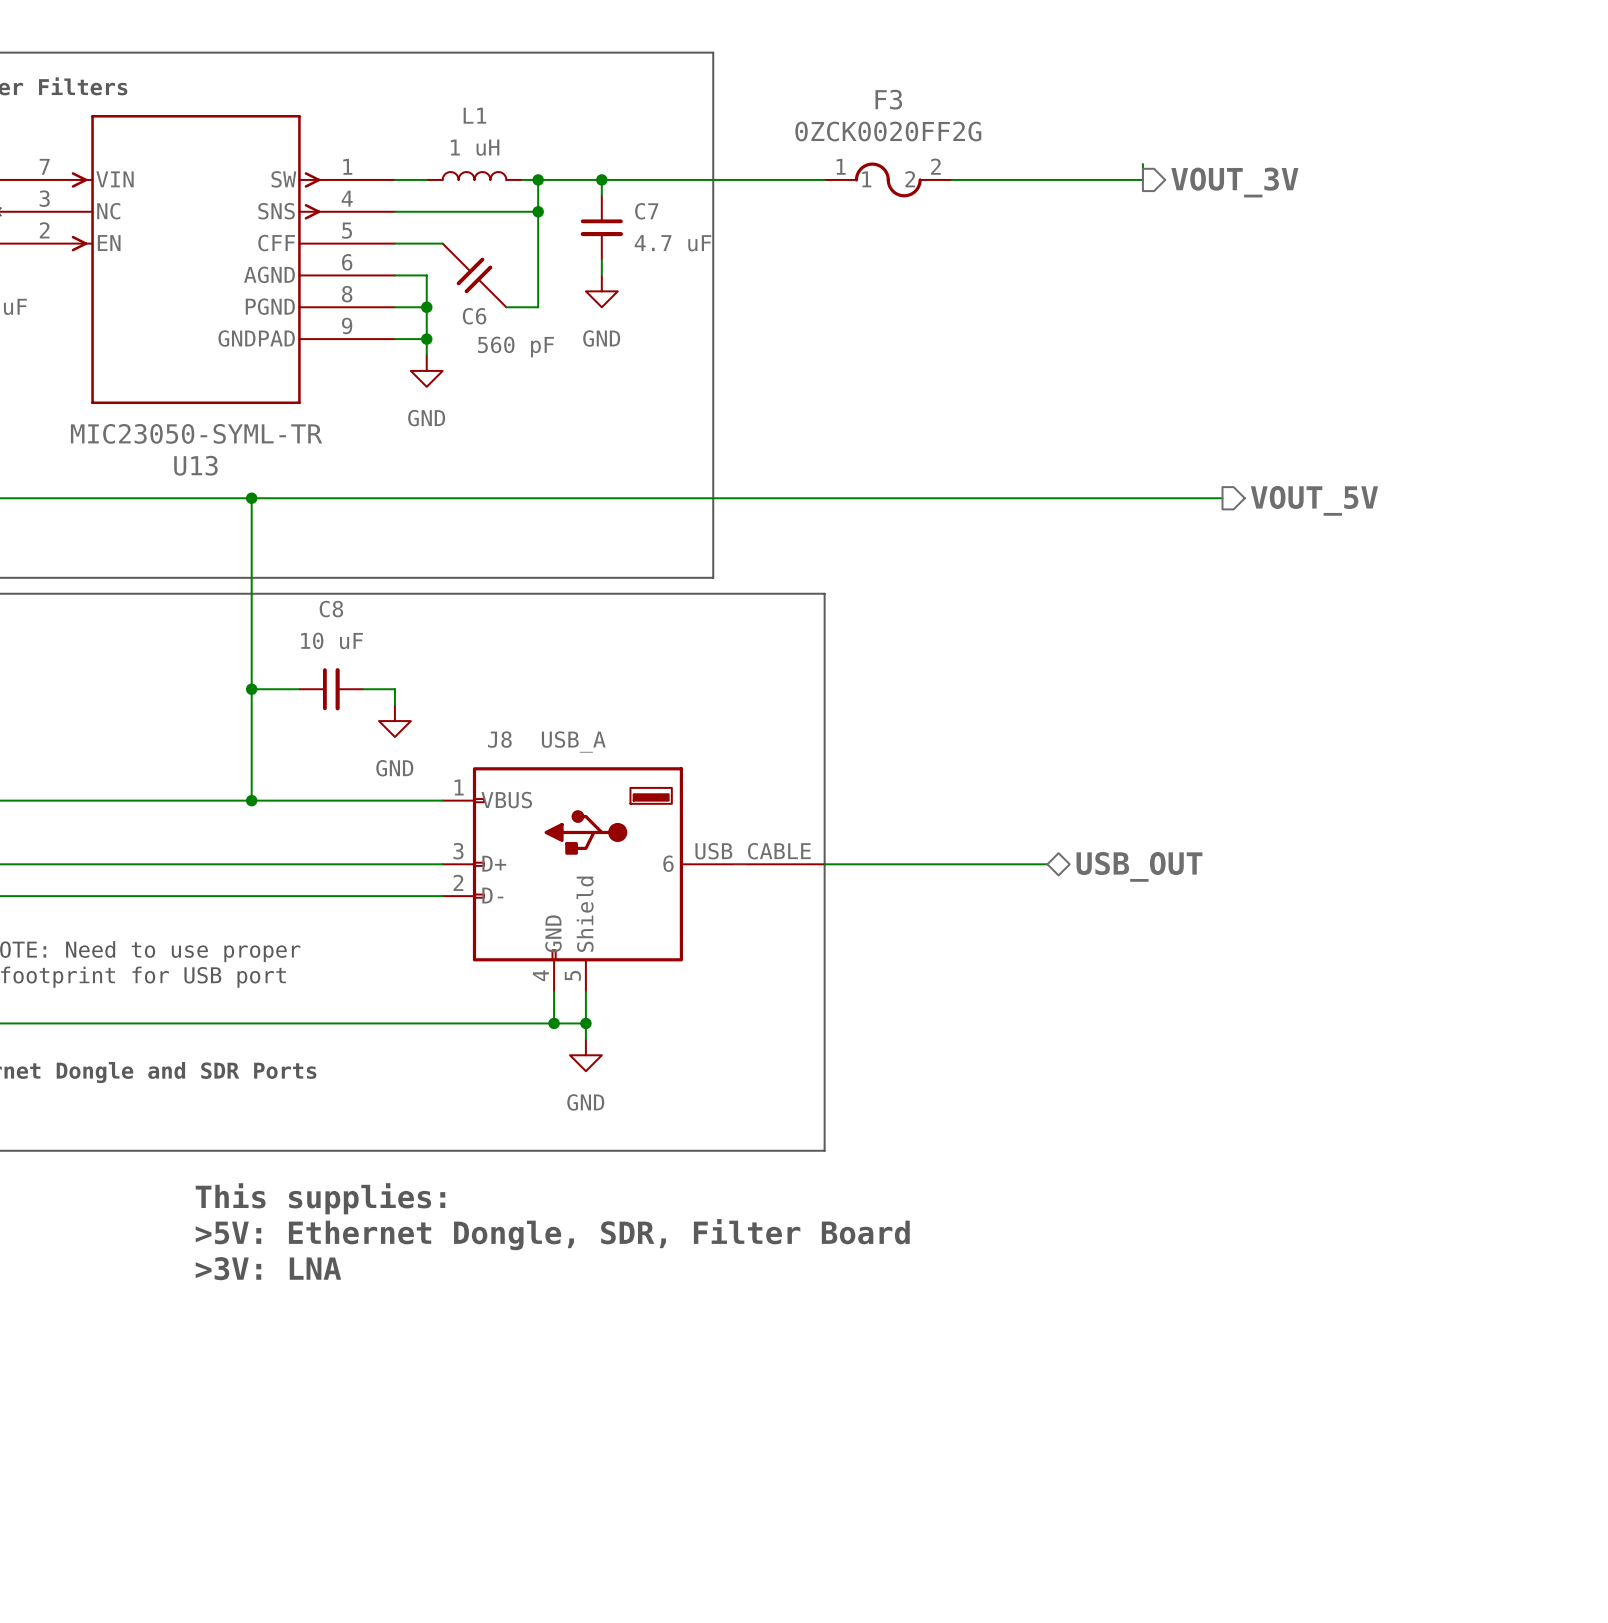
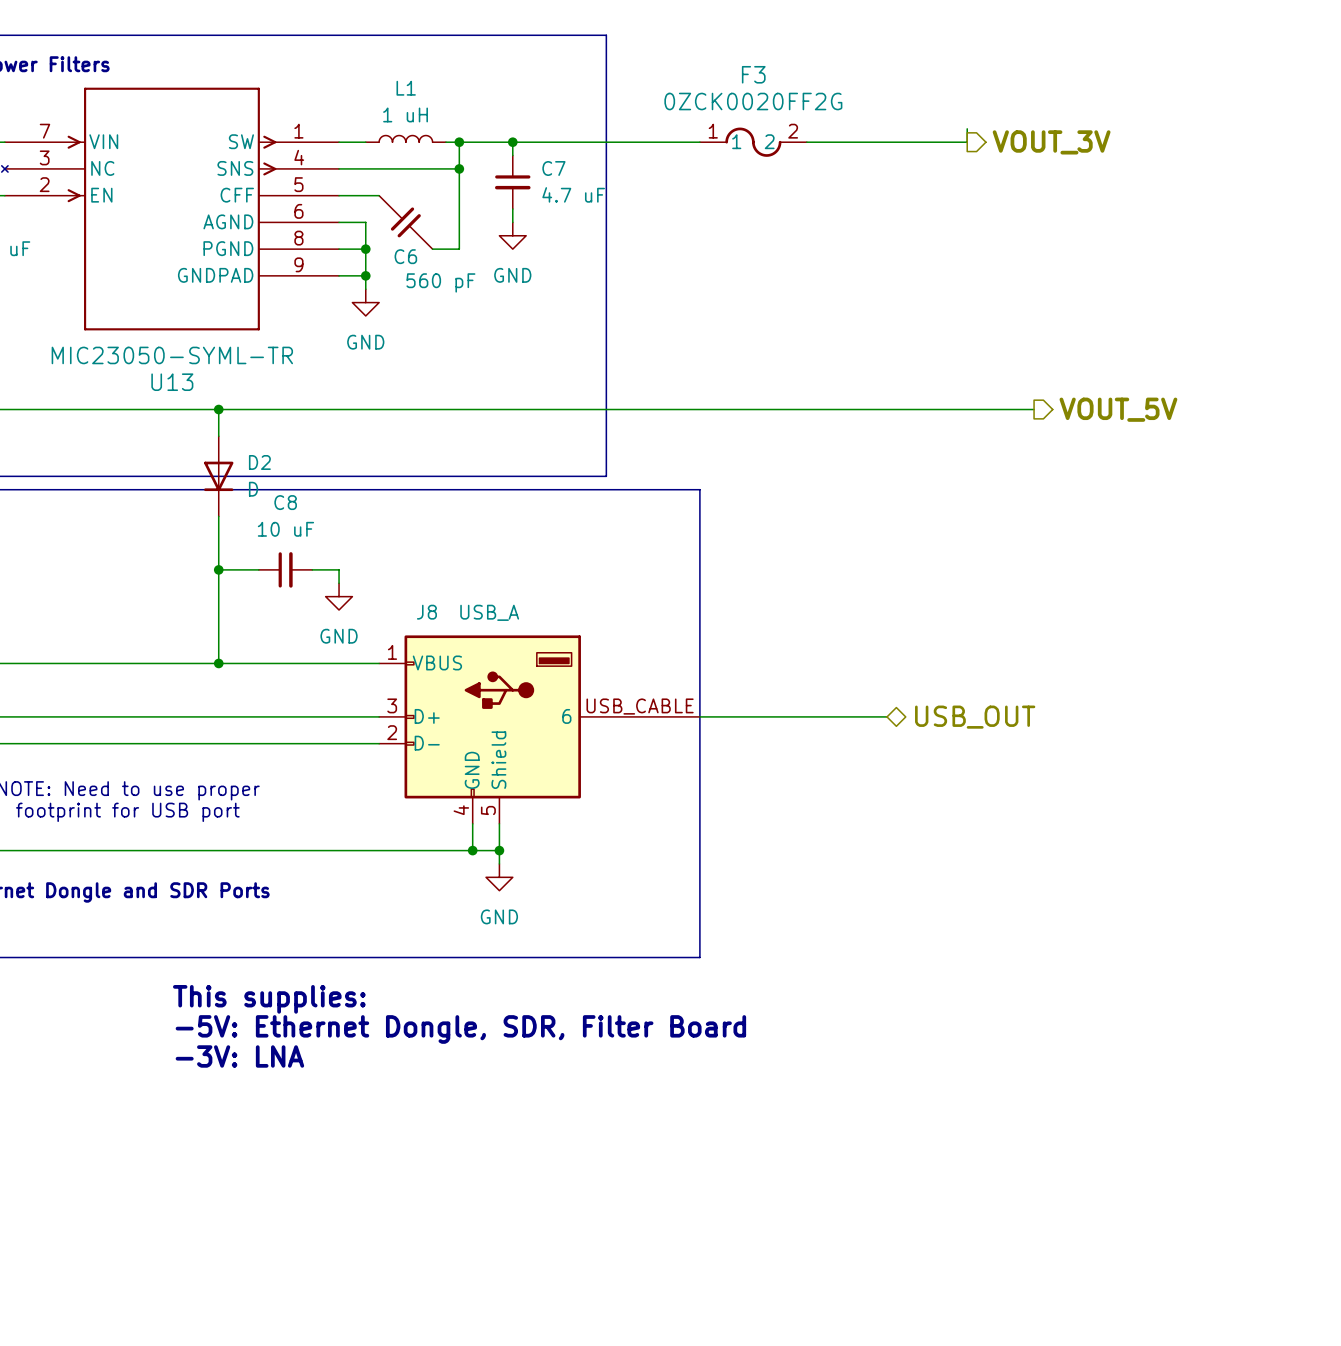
D2: none -> D (218, 476)
text: >5V: Ethernet Dongle, SDR, Filter Board (552, 1234) -> -5V: Ethernet Dongle, SDR, Filter Board (460, 1029)
text: >3V: LNA (268, 1268) -> -3V: LNA (239, 1056)

